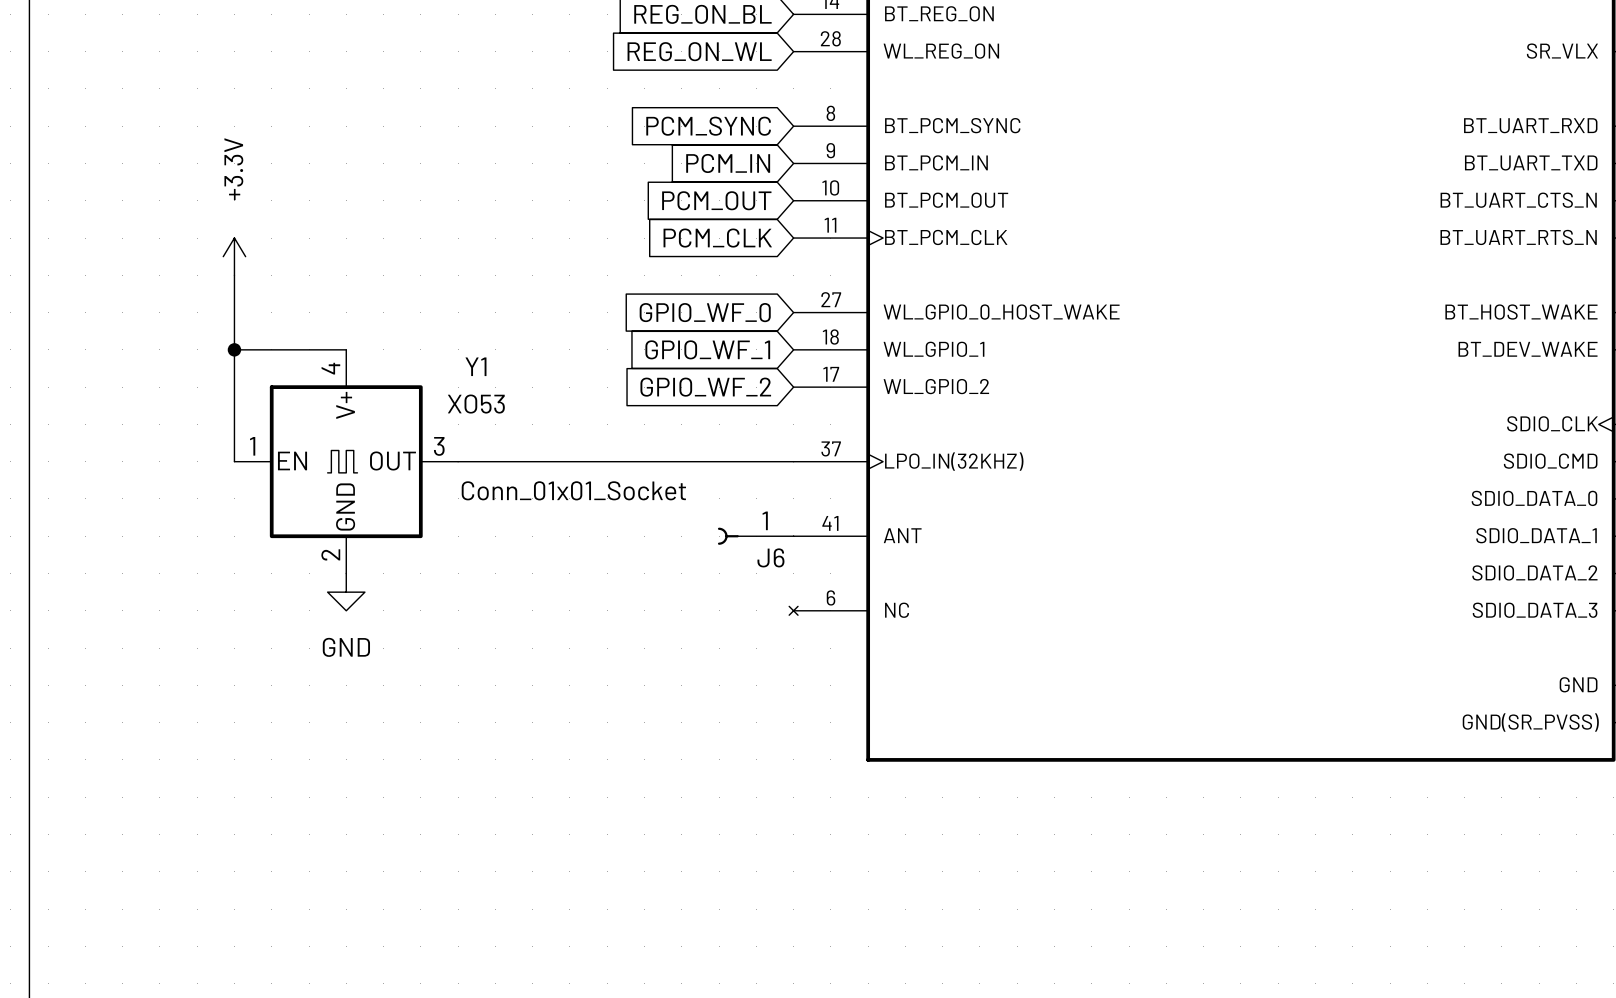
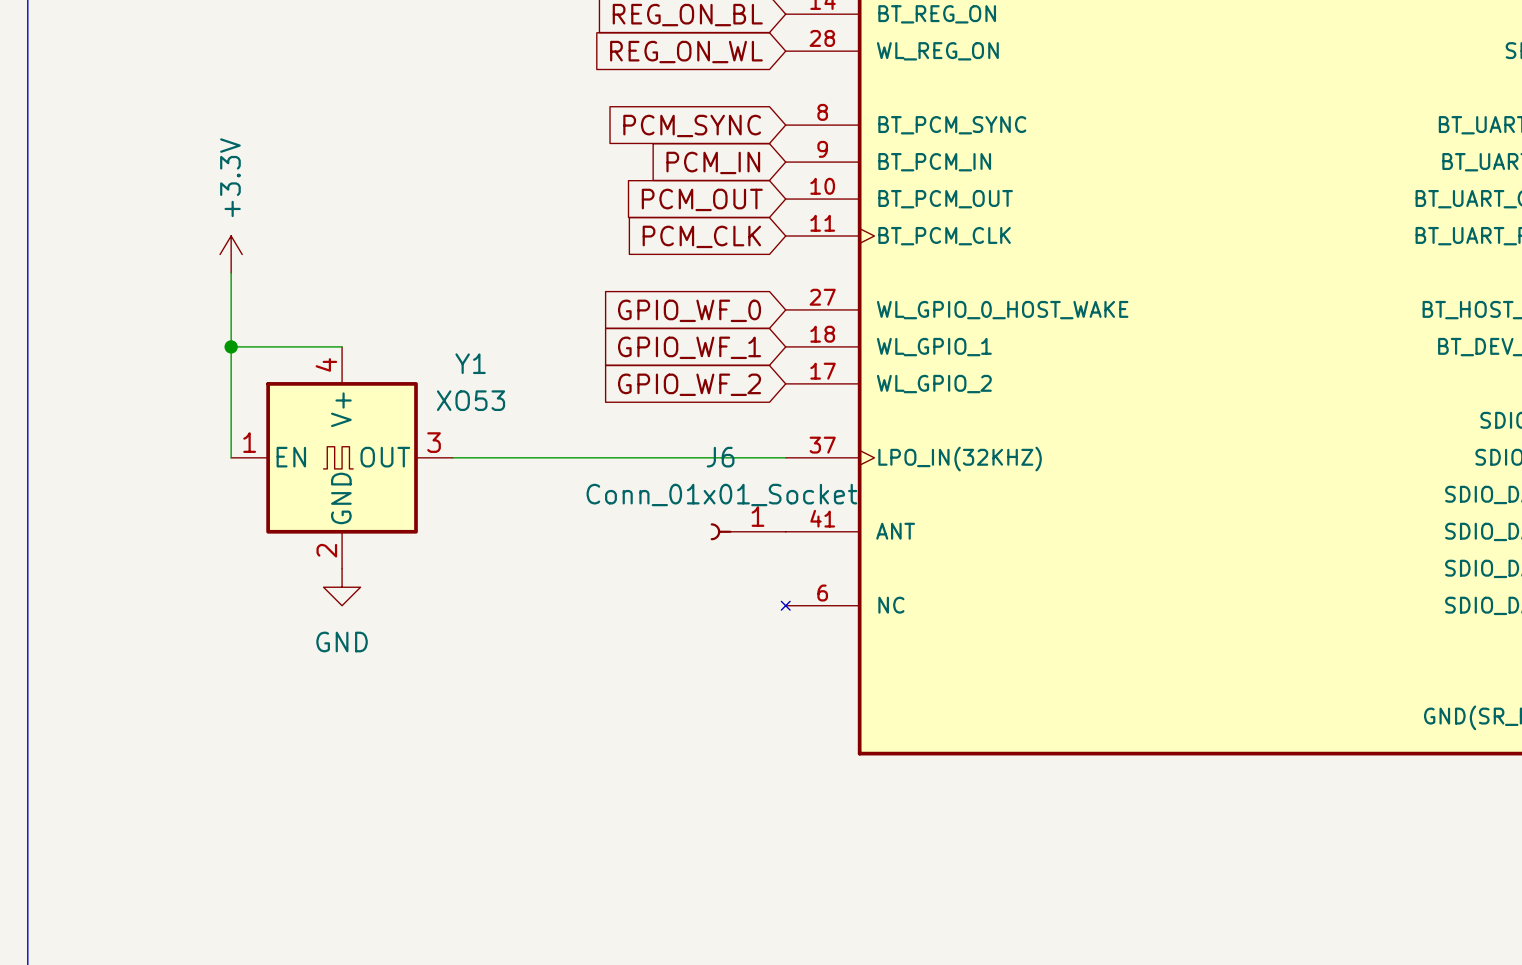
J6 value position: Conn_01x01_Socket (573, 490) -> Conn_01x01_Socket (721, 495)
J6 name position: J6 (770, 557) -> J6 (720, 457)

